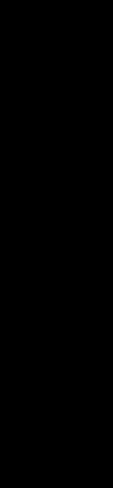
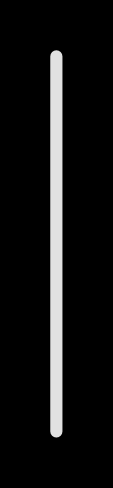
line: none -> (56, 56) (56, 431)

